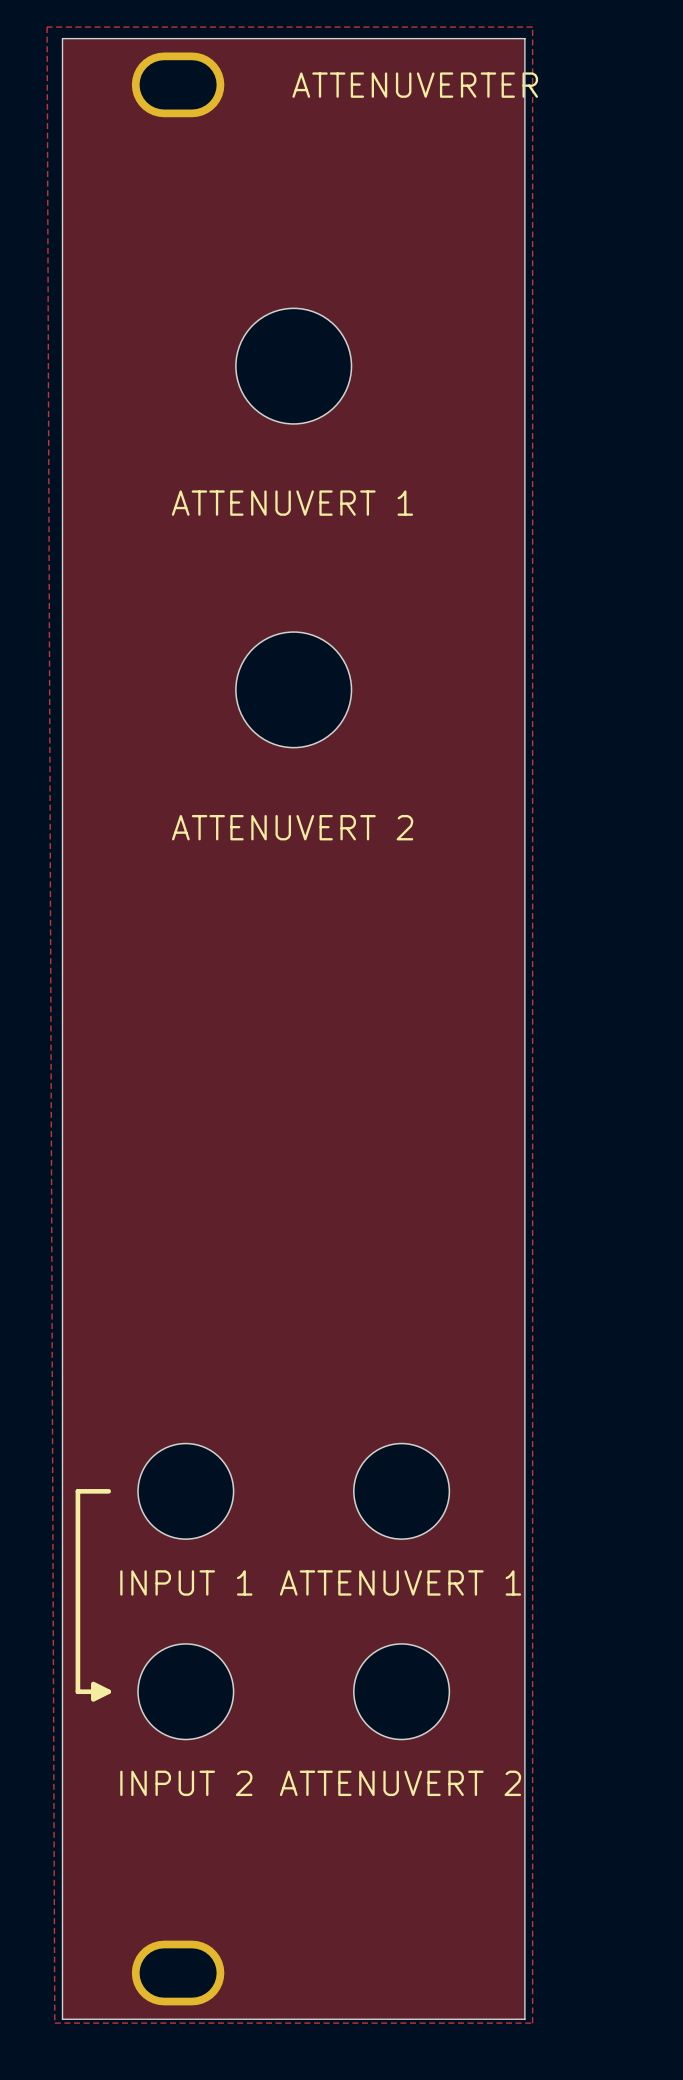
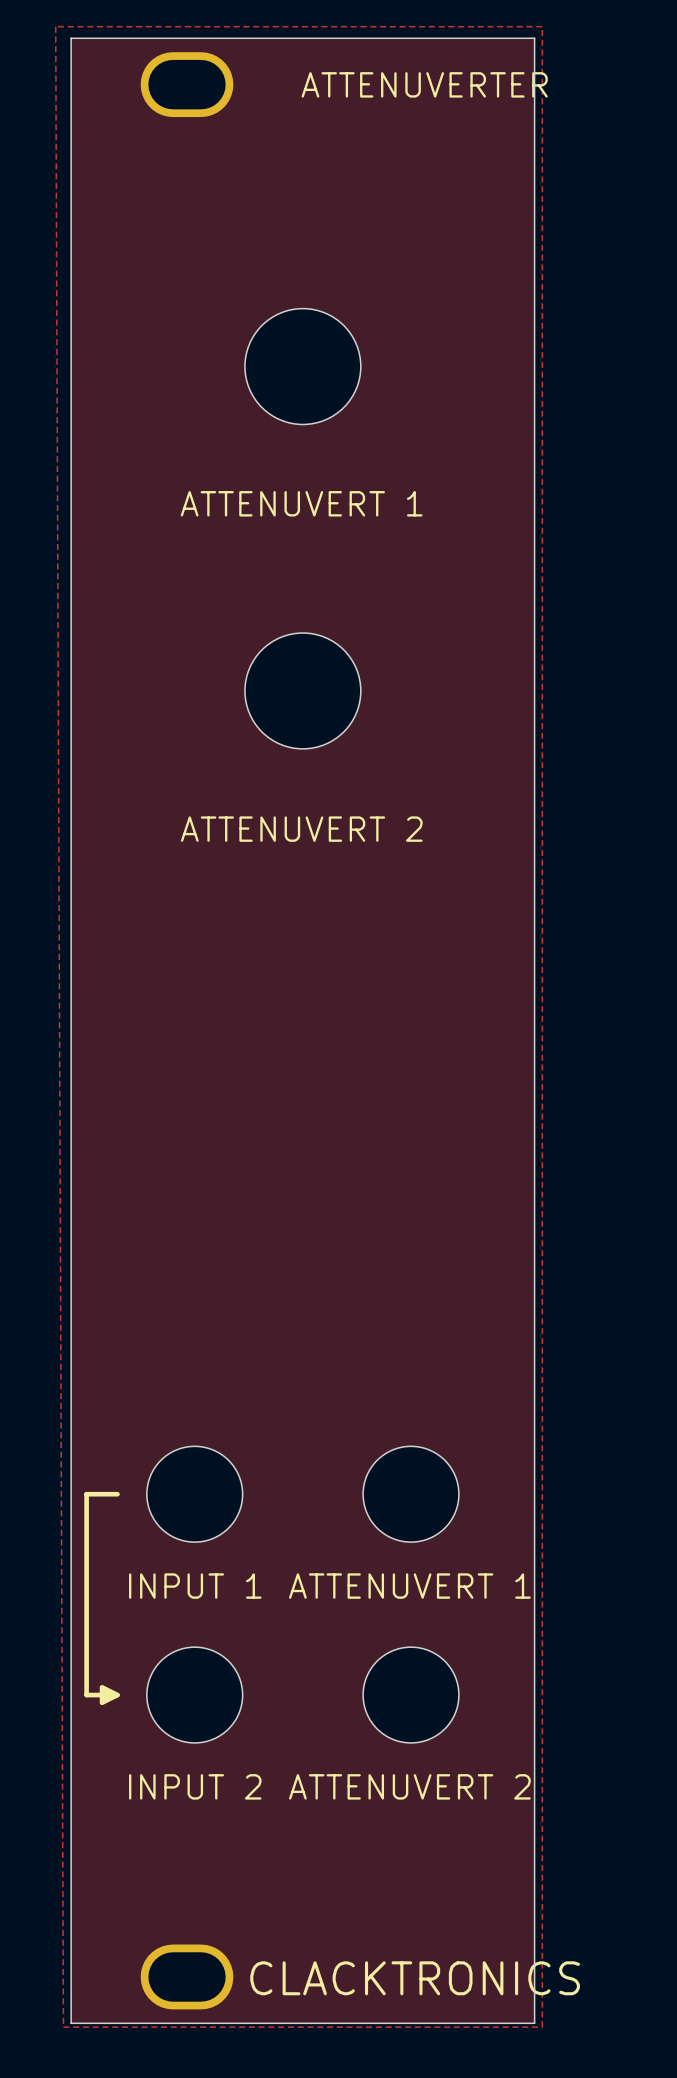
text: none -> CLACKTRONICS (415, 1978)

